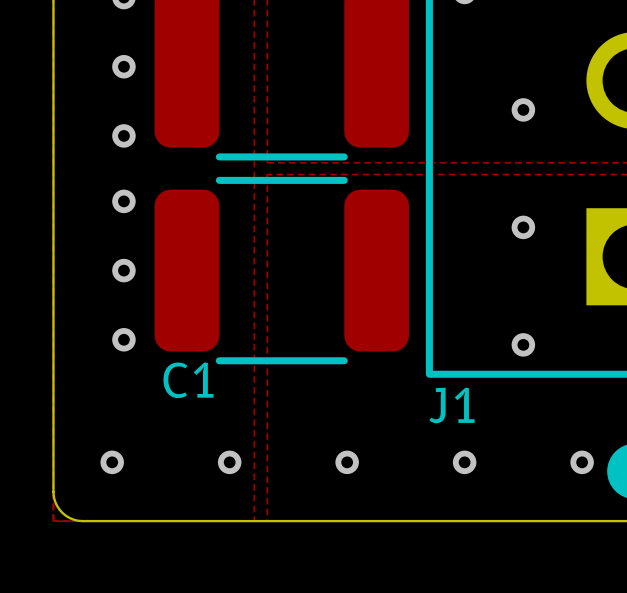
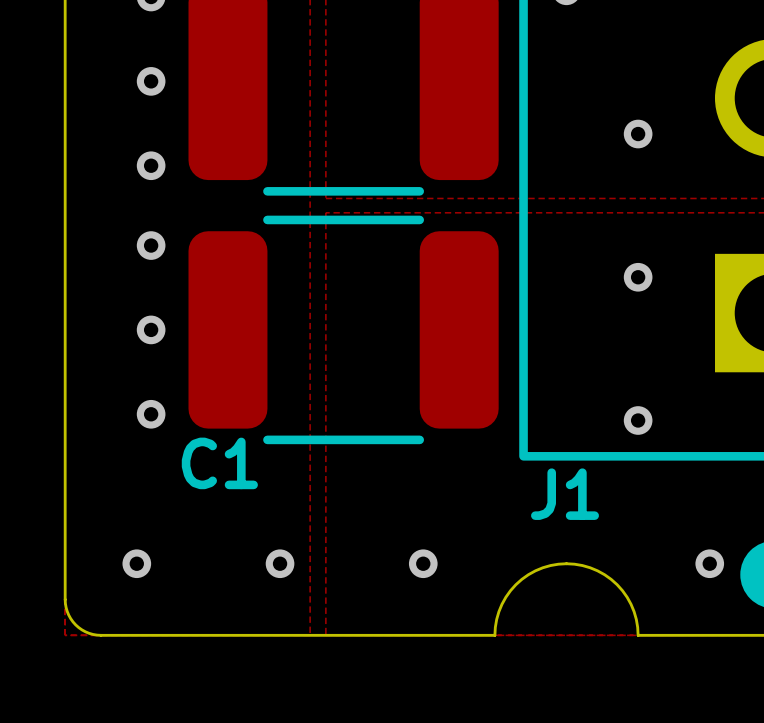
via: (464, 462) -> none
board edge: (405, 521) (523, 521) -> (494, 635) (498, 611) (505, 597) (515, 584) (528, 574) (542, 567) (566, 563) (590, 567) (604, 574) (617, 584) (631, 604) (636, 619) (638, 635)

